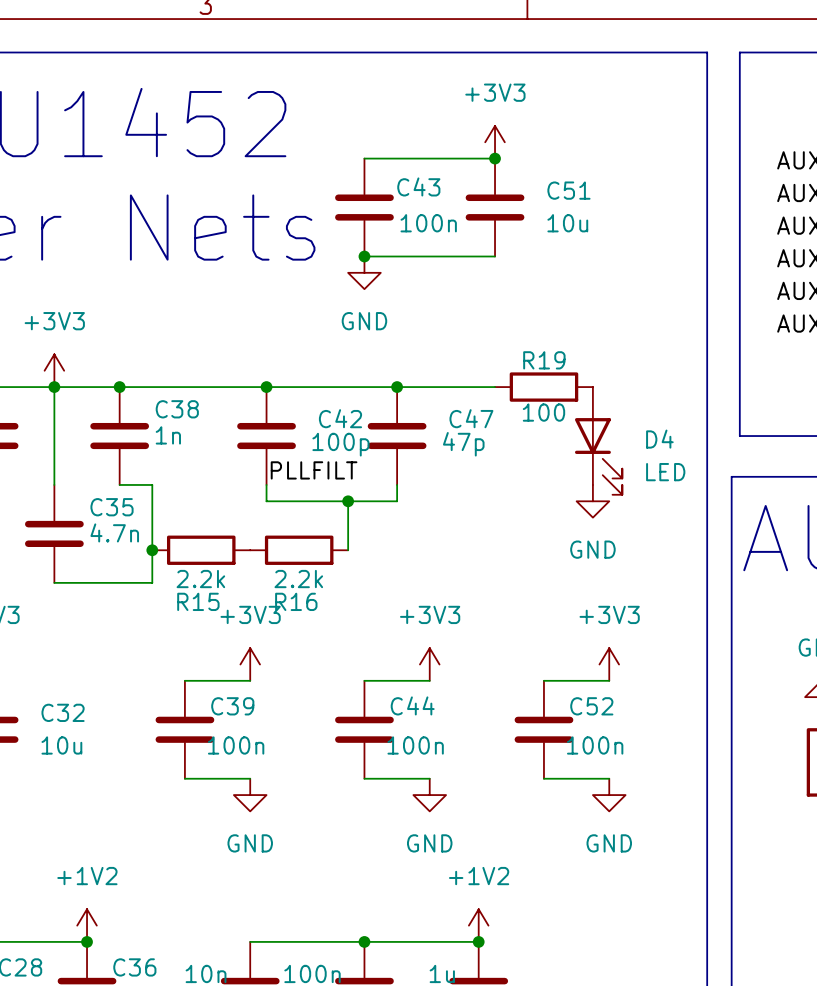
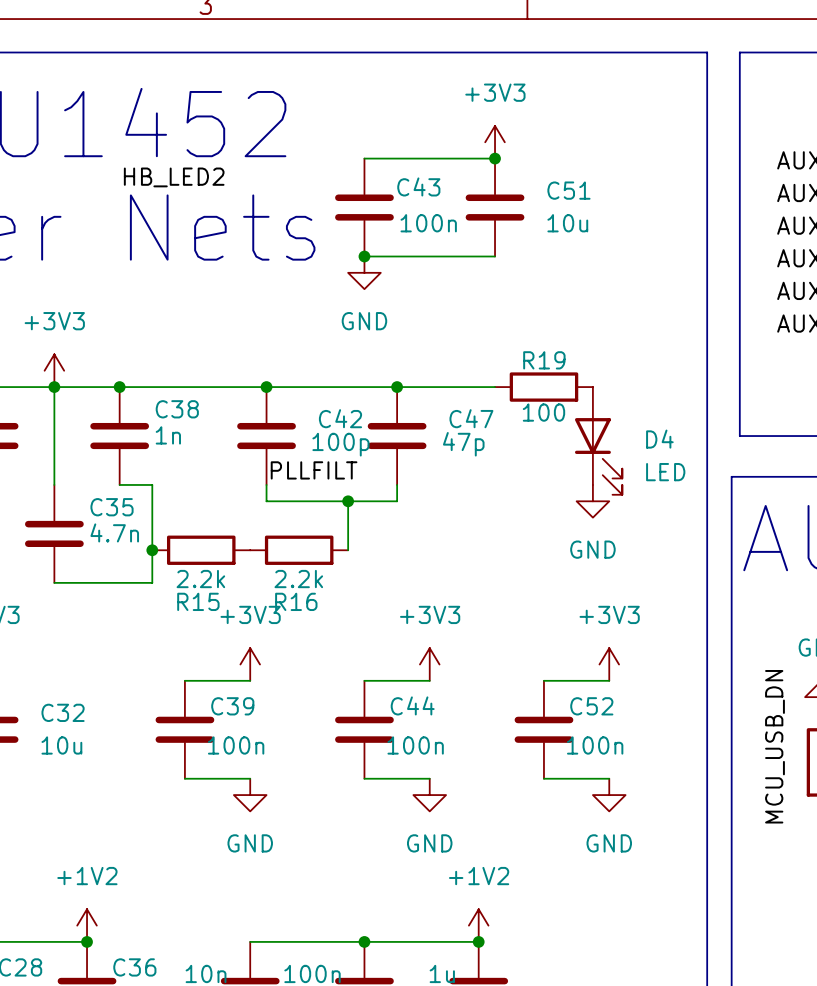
label: none -> HB_LED2 (174, 177)
label: none -> MCU_USB_DN (774, 746)

